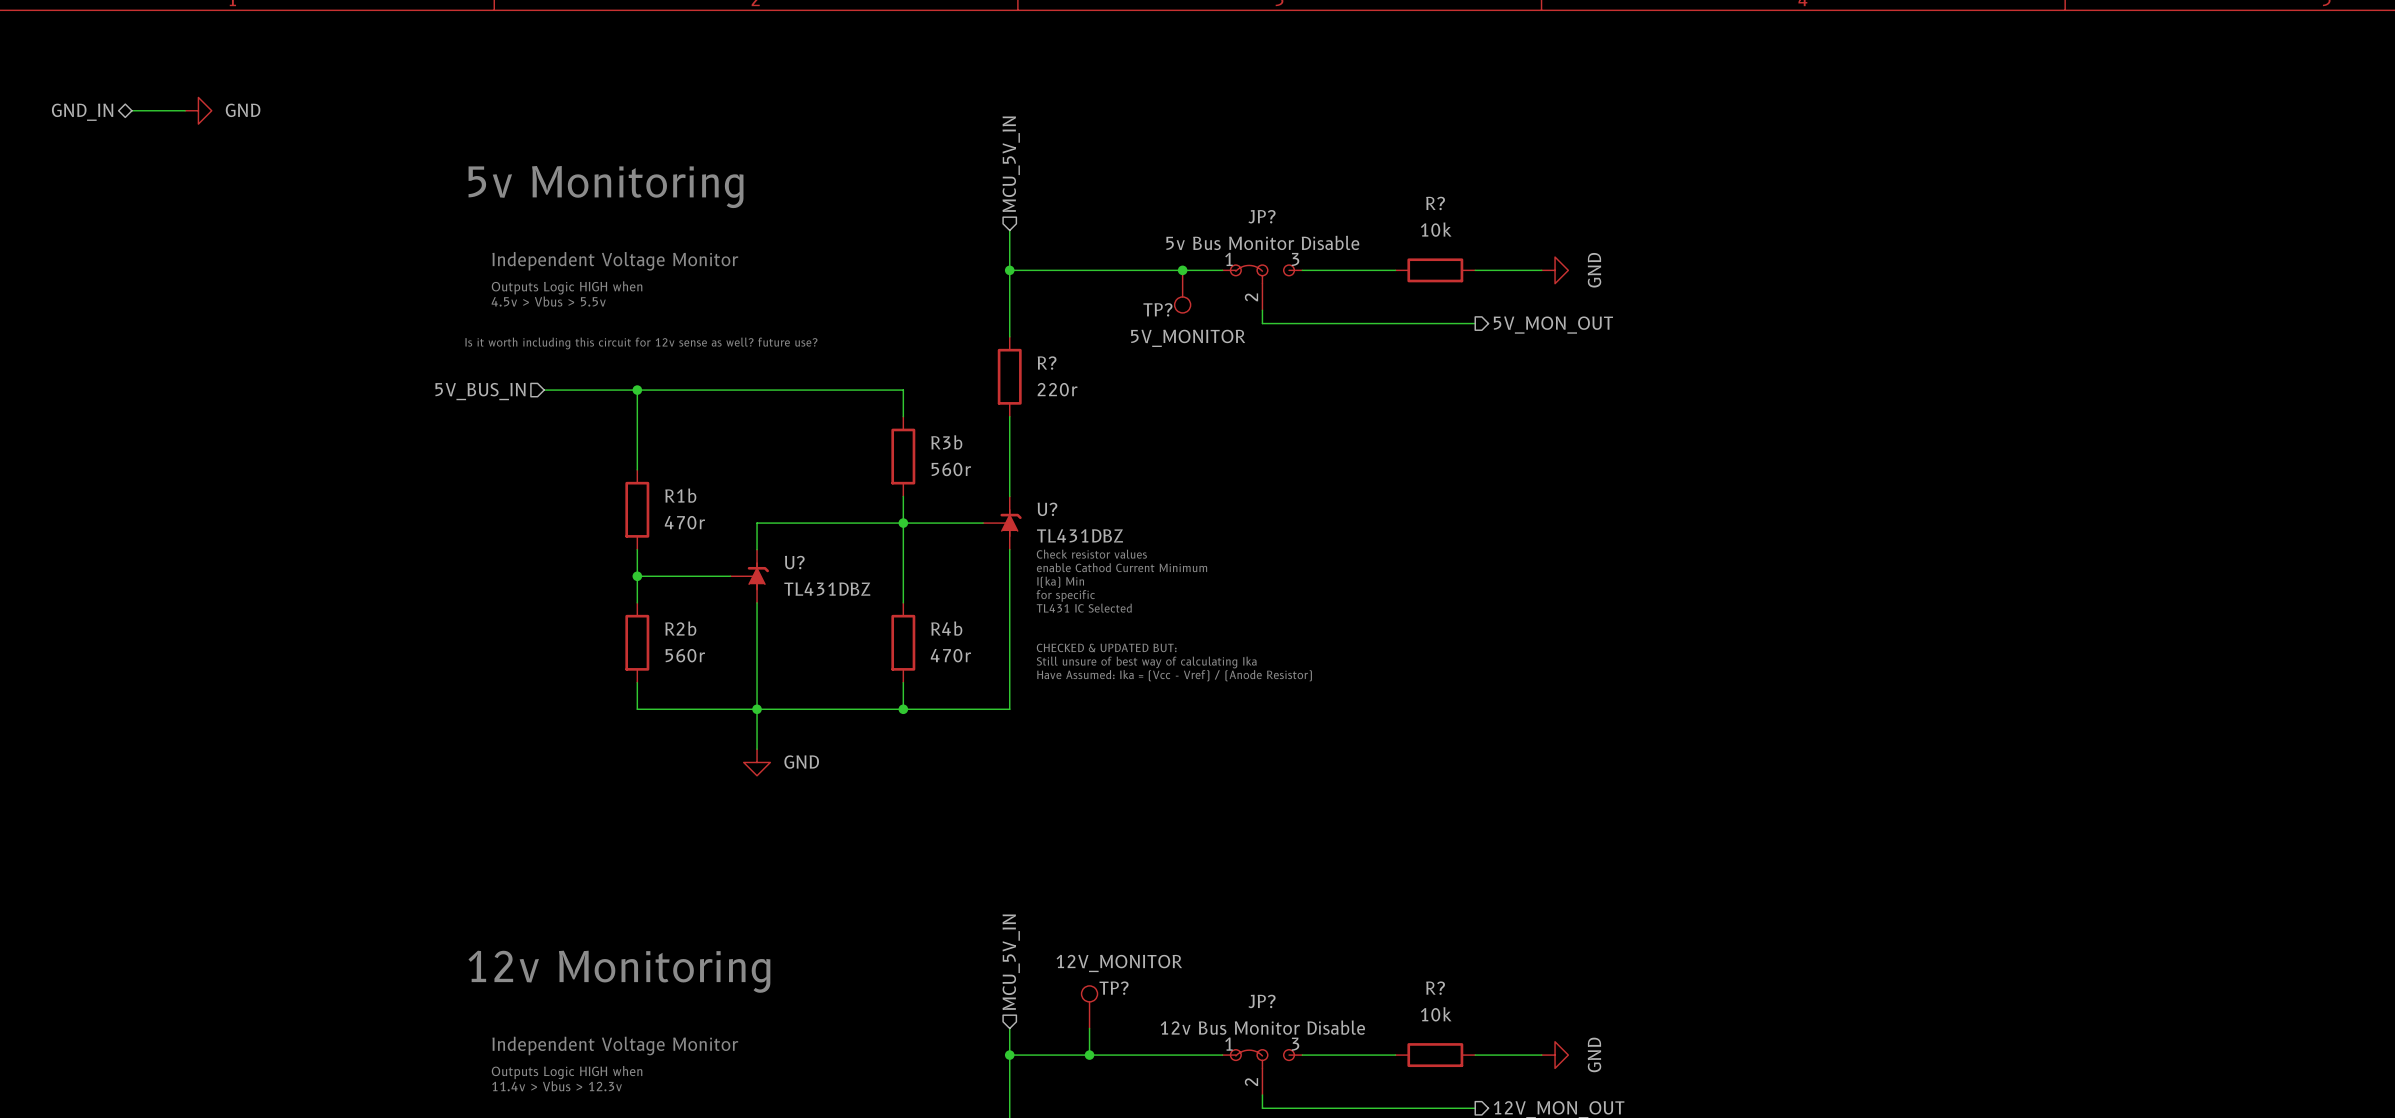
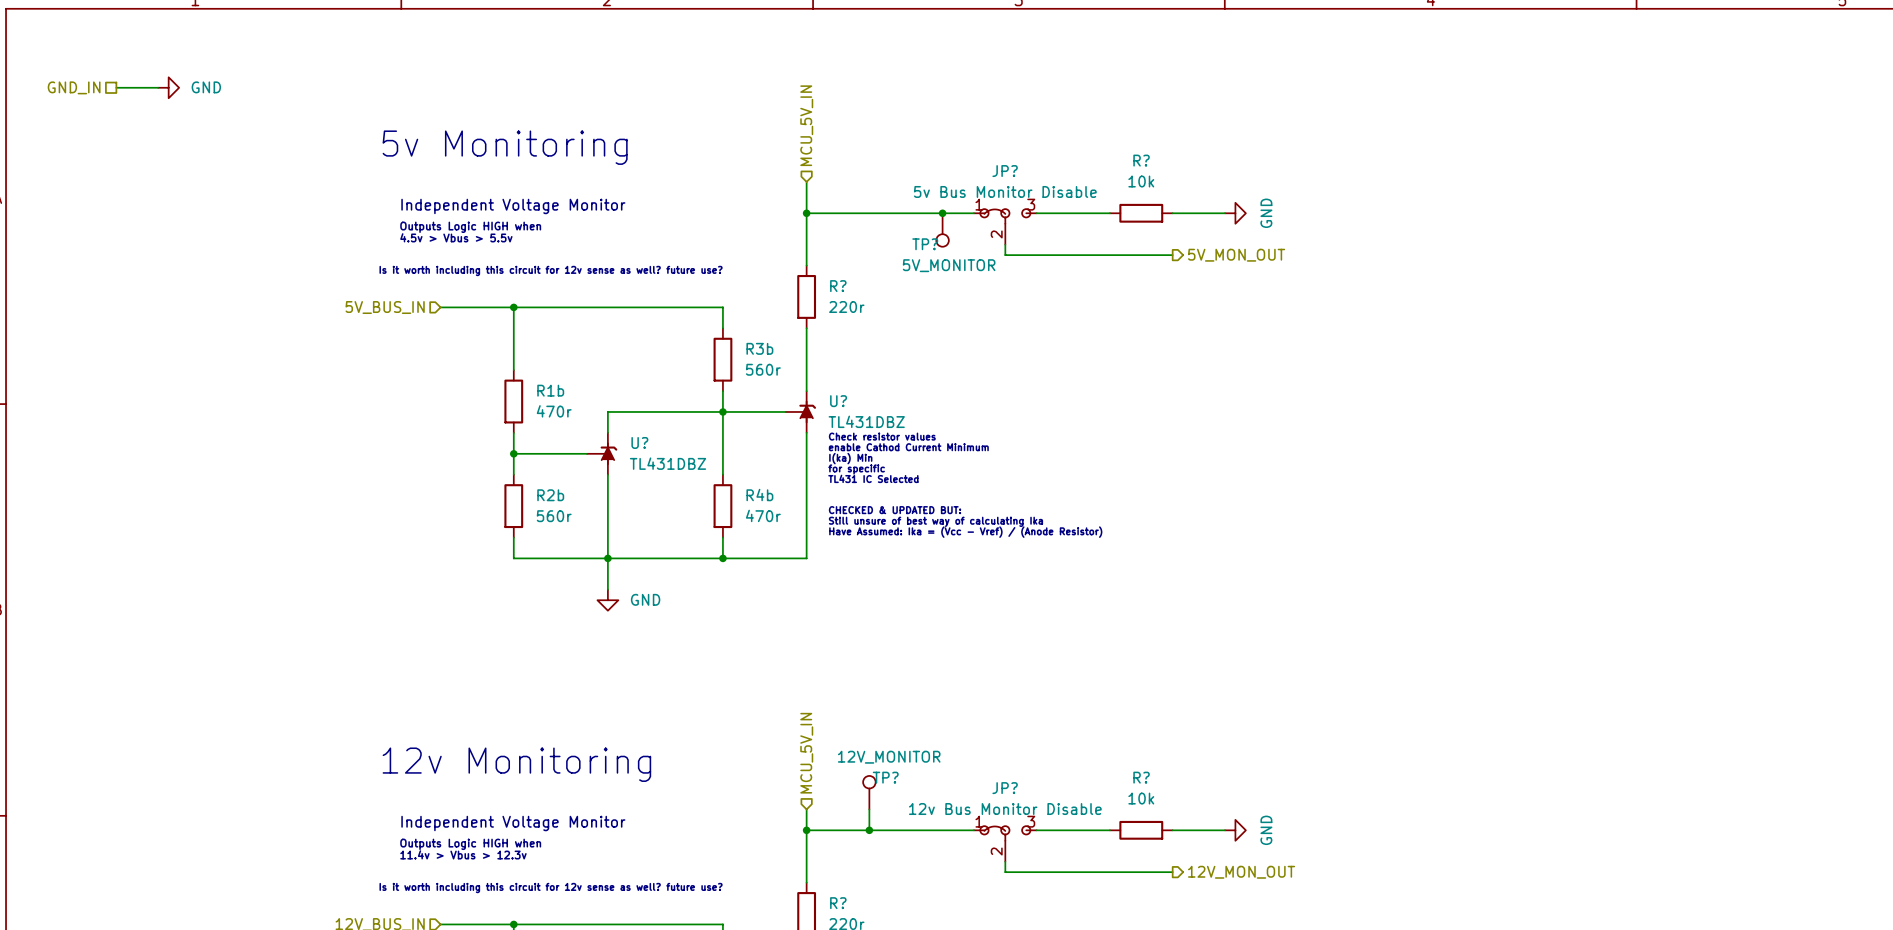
hierarchical label shape: bidirectional (82, 112) -> passive (74, 87)

